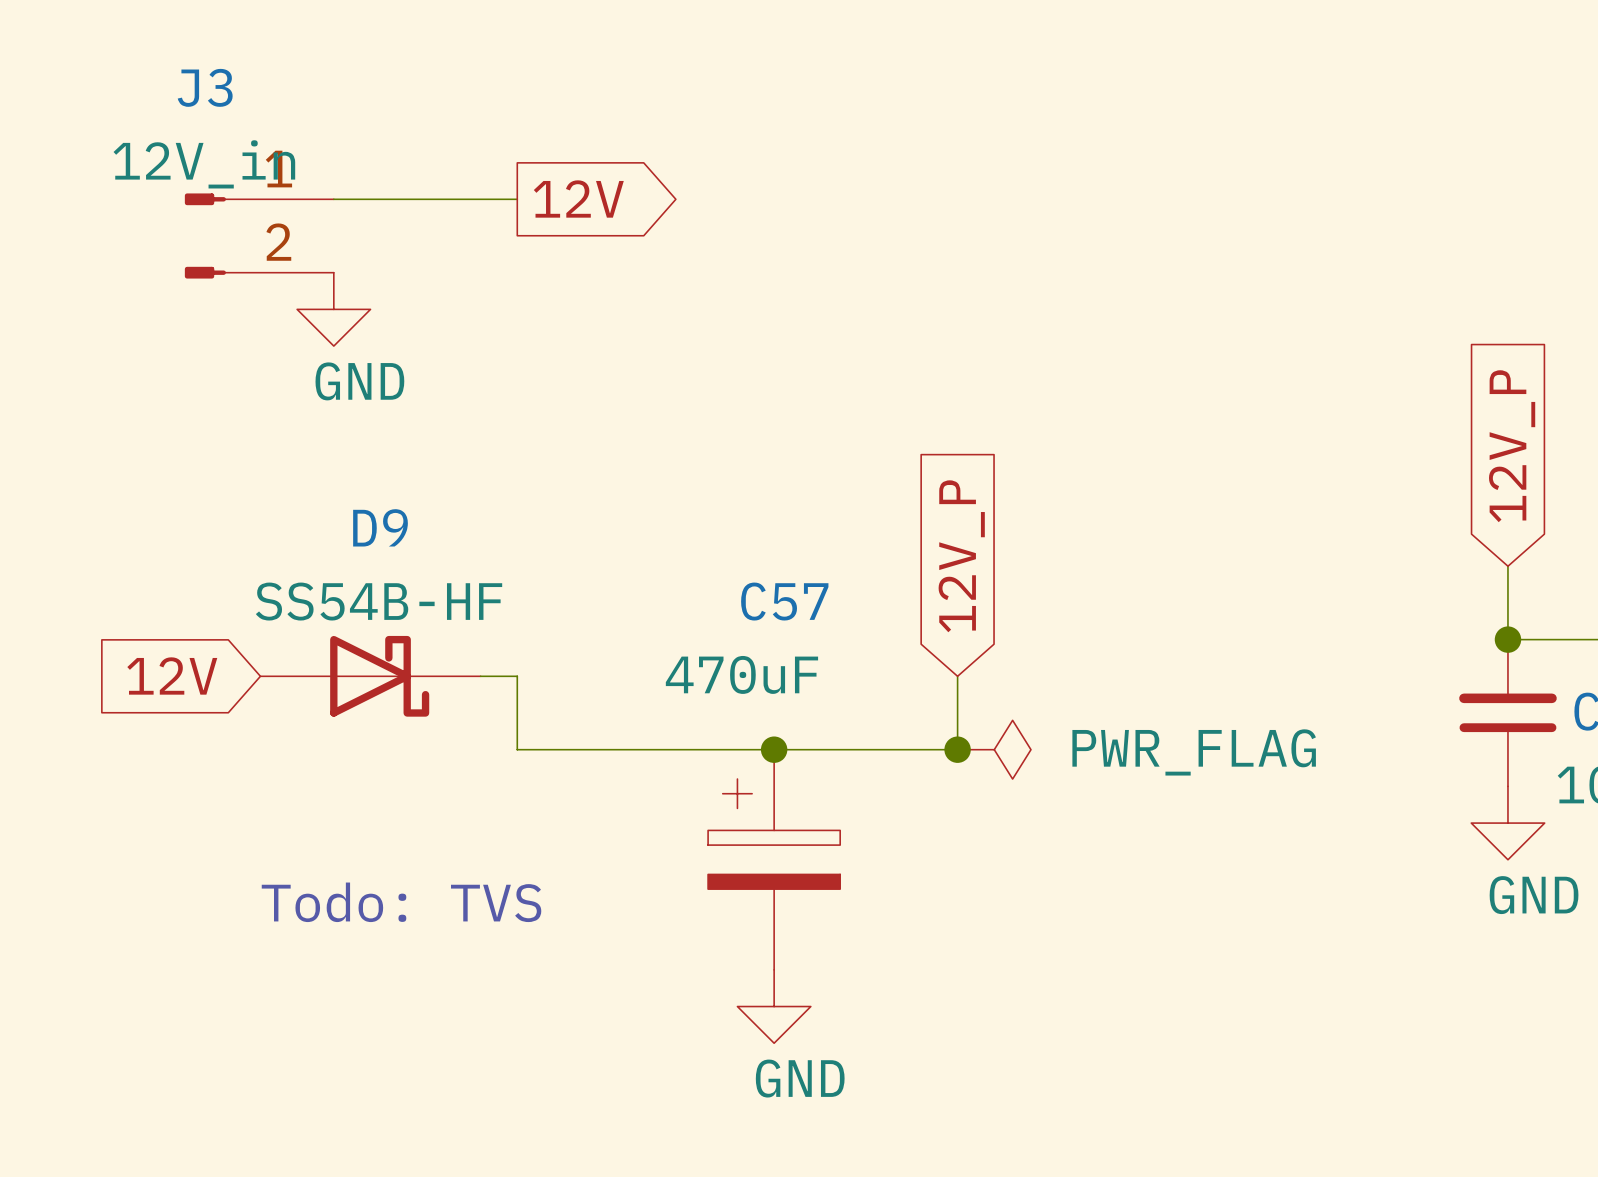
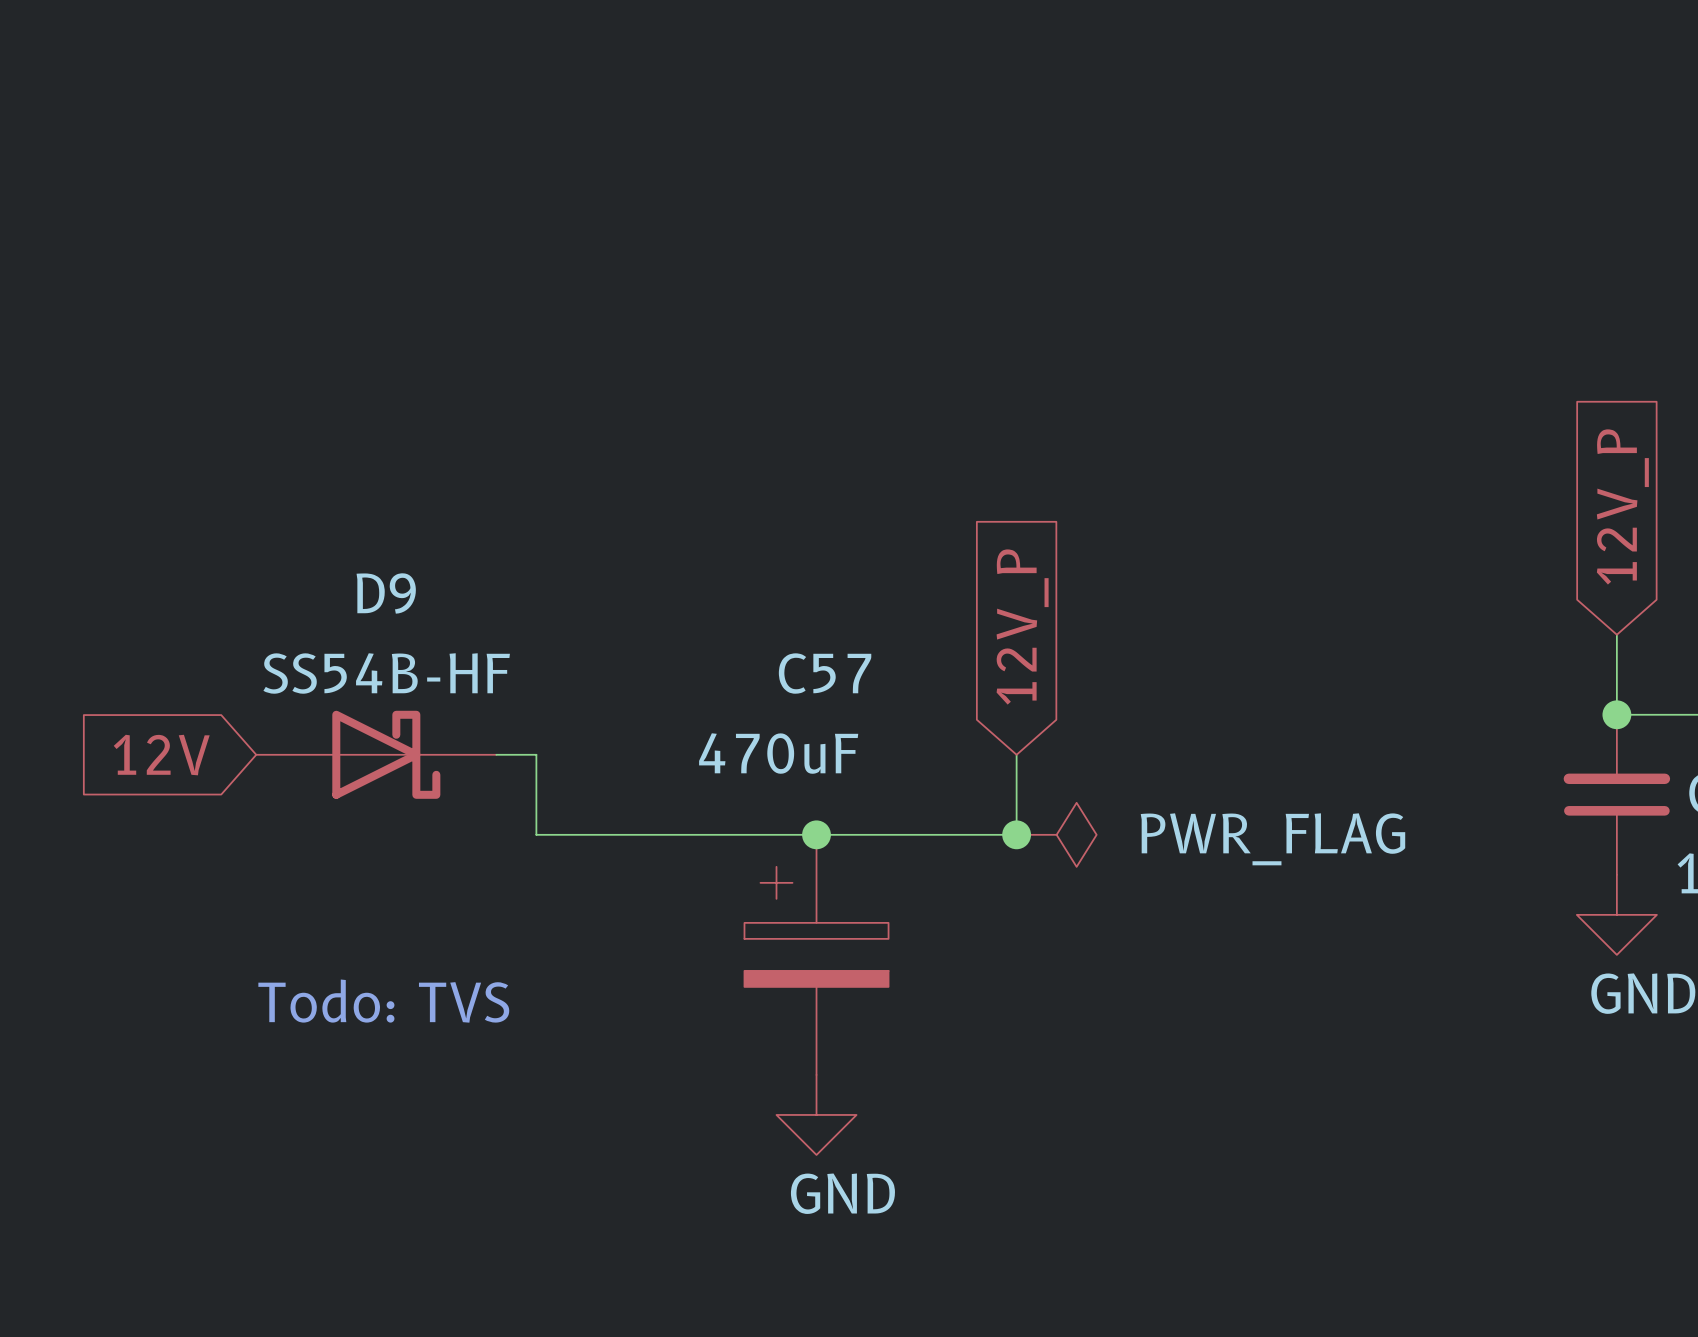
global label: 12V (578, 198) -> none
wire: (333, 199) (517, 199) -> none
J3: 12V_in (259, 236) -> none
power symbol: GND (333, 309) -> none

